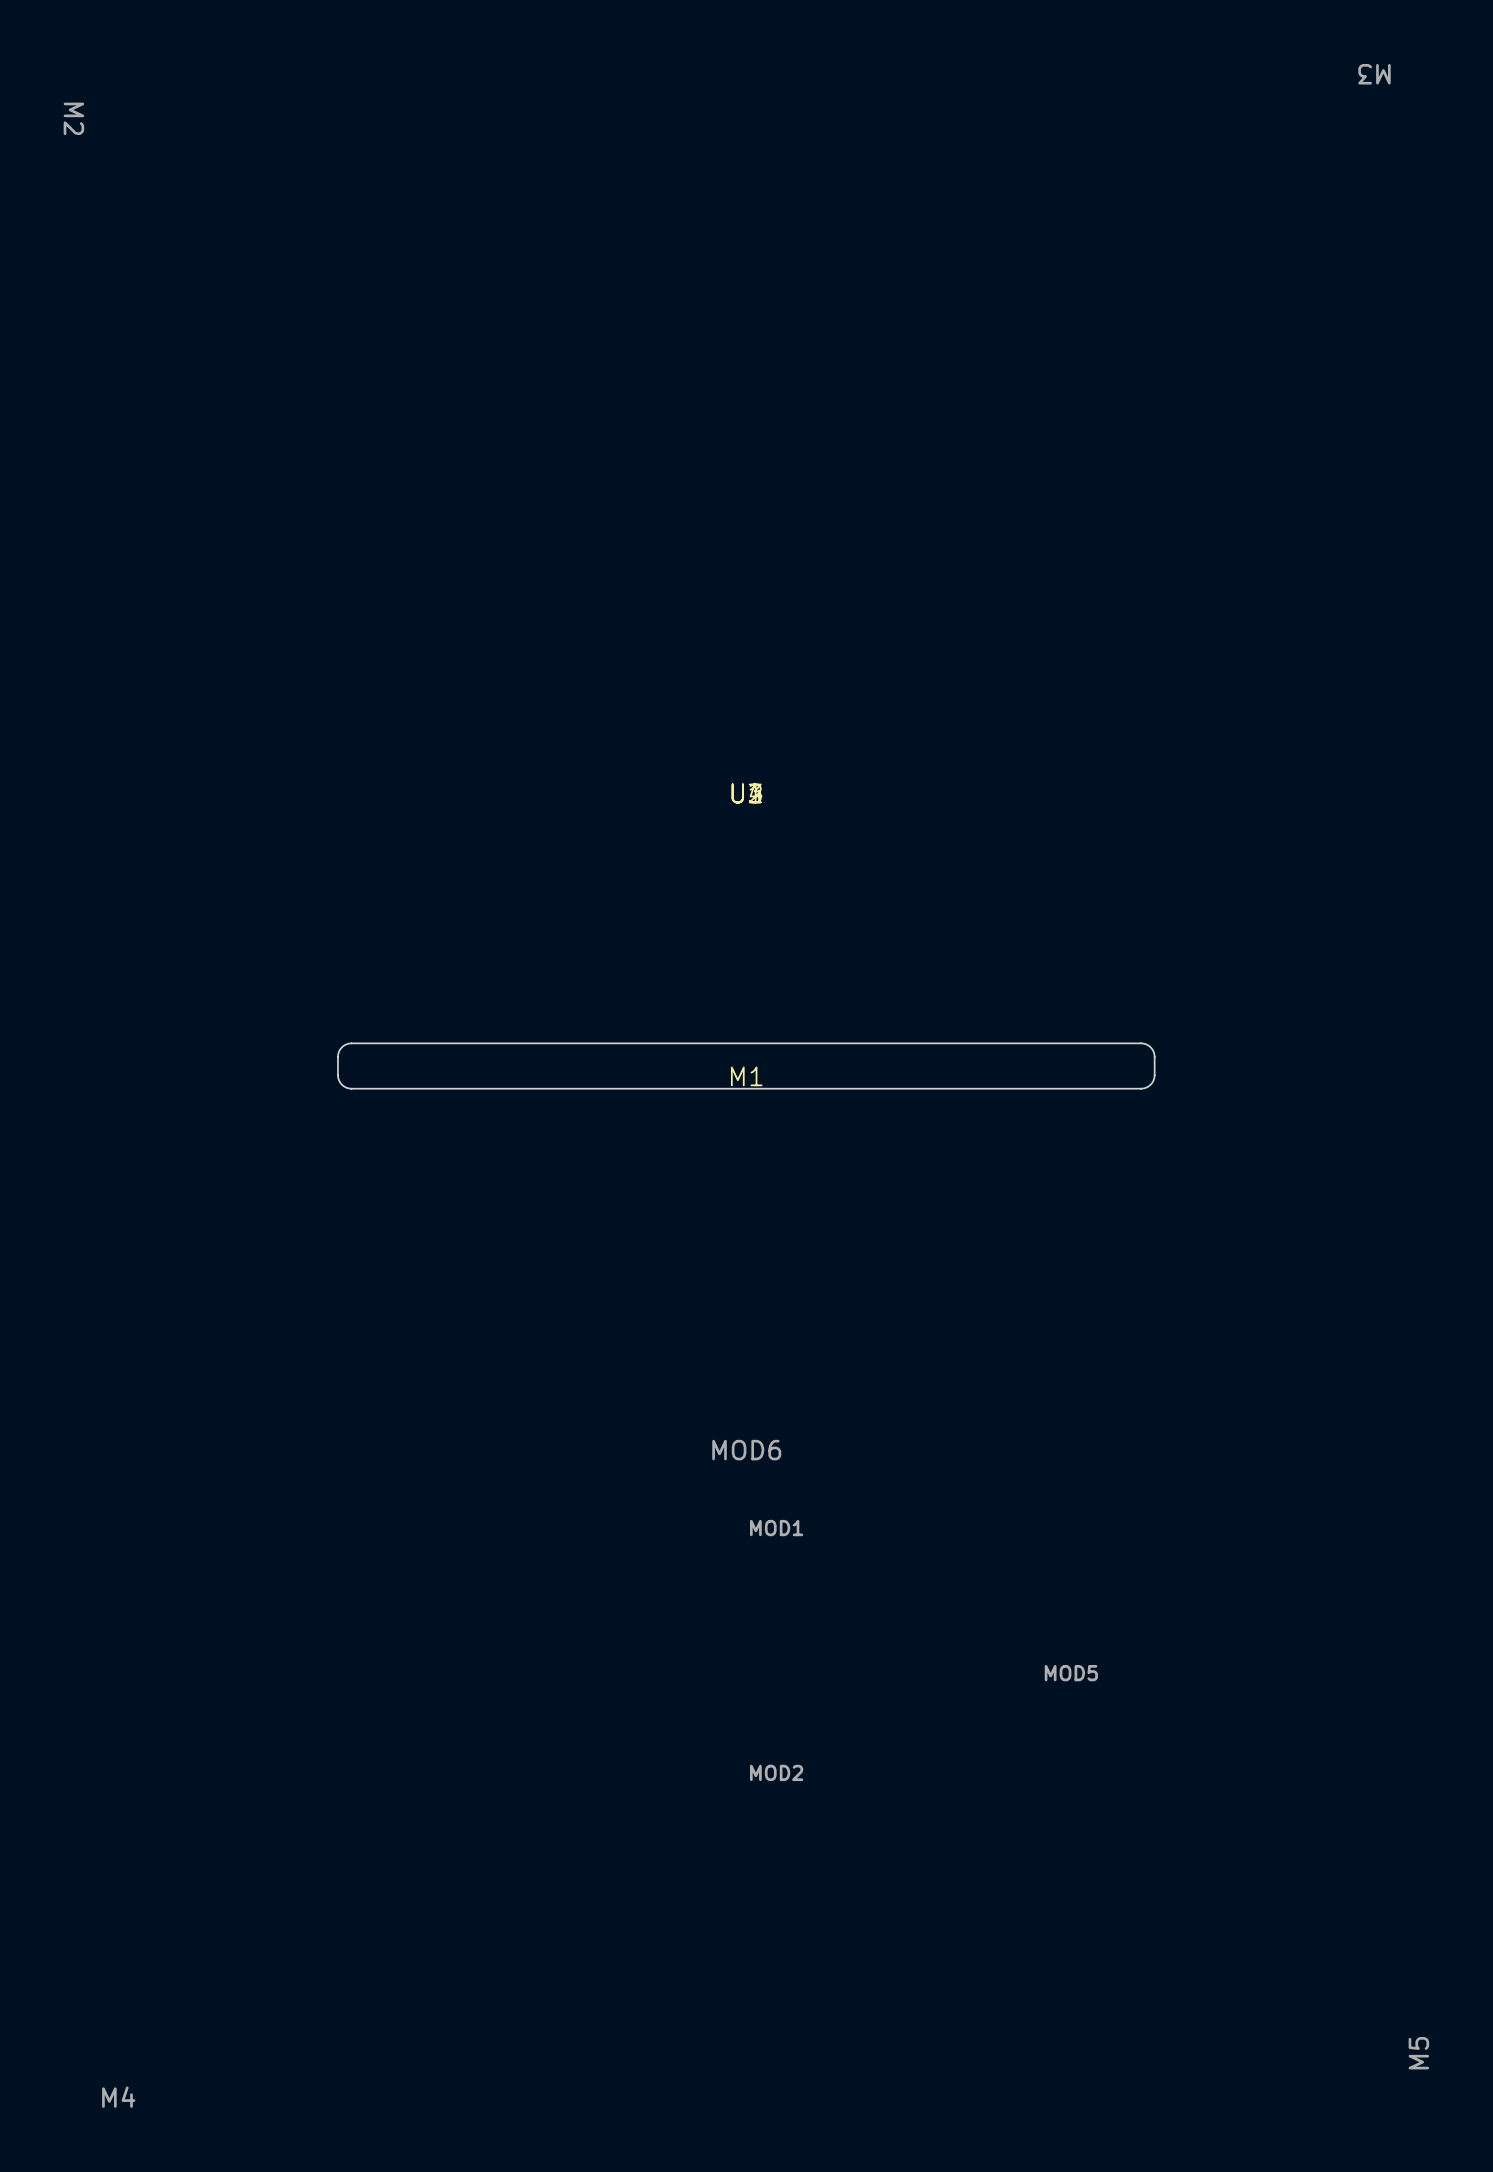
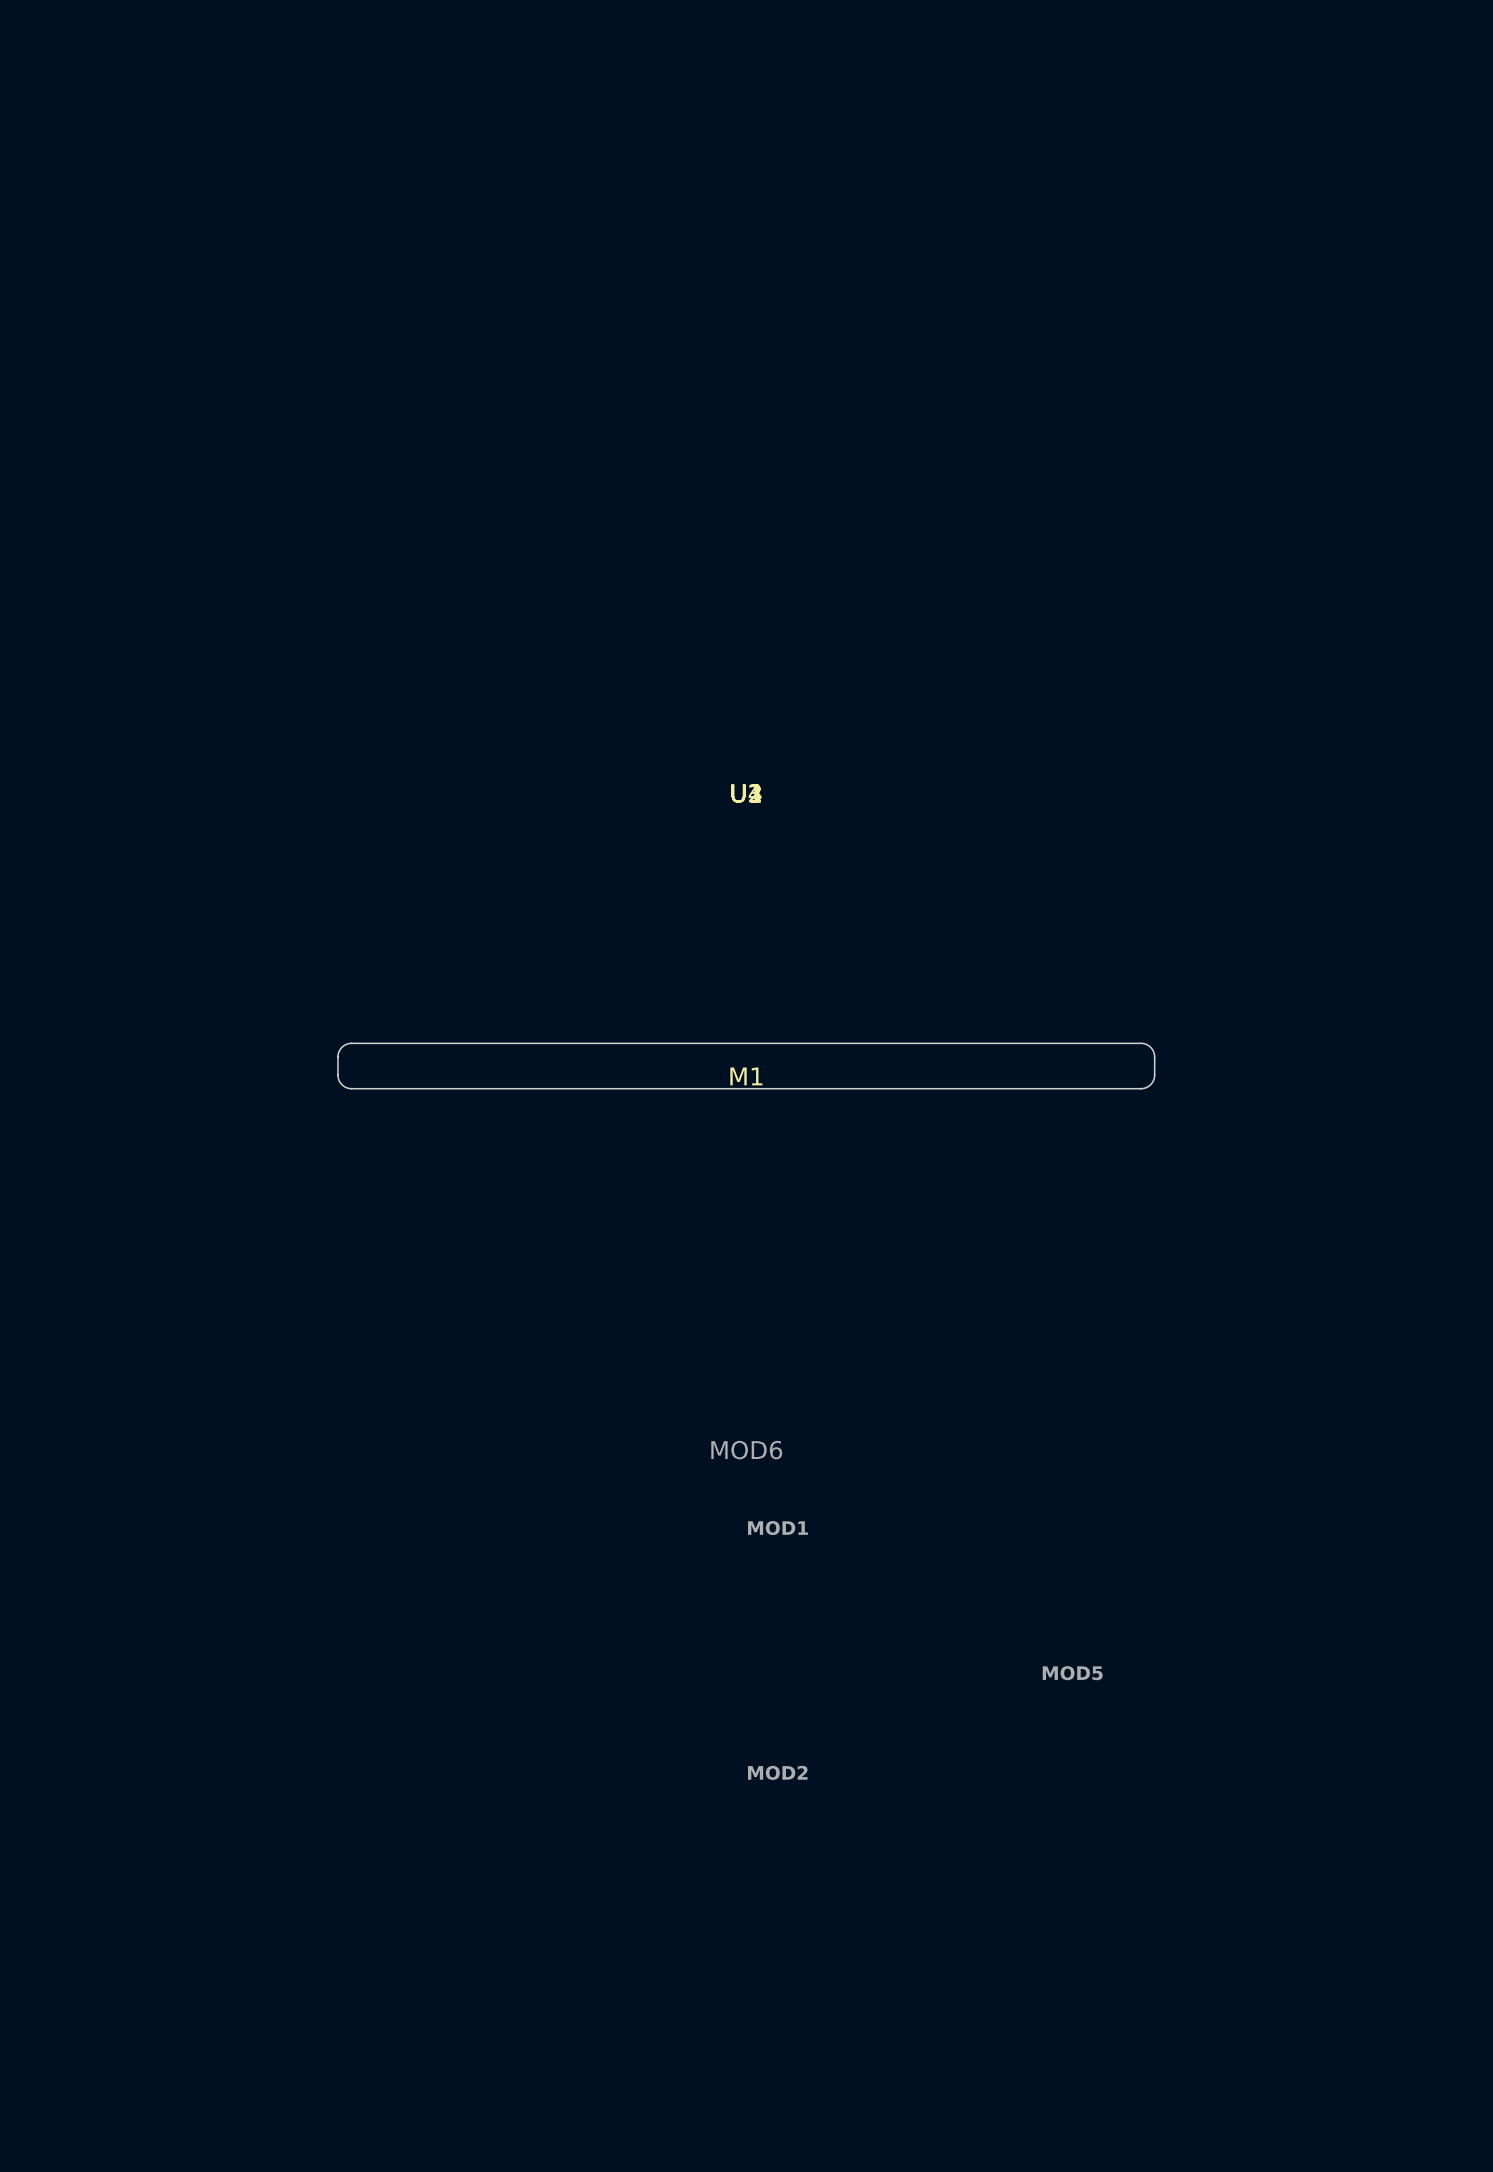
M3: (1374, 74) -> none
M2: (73, 118) -> none
M5: (1418, 2053) -> none
M4: (118, 2097) -> none

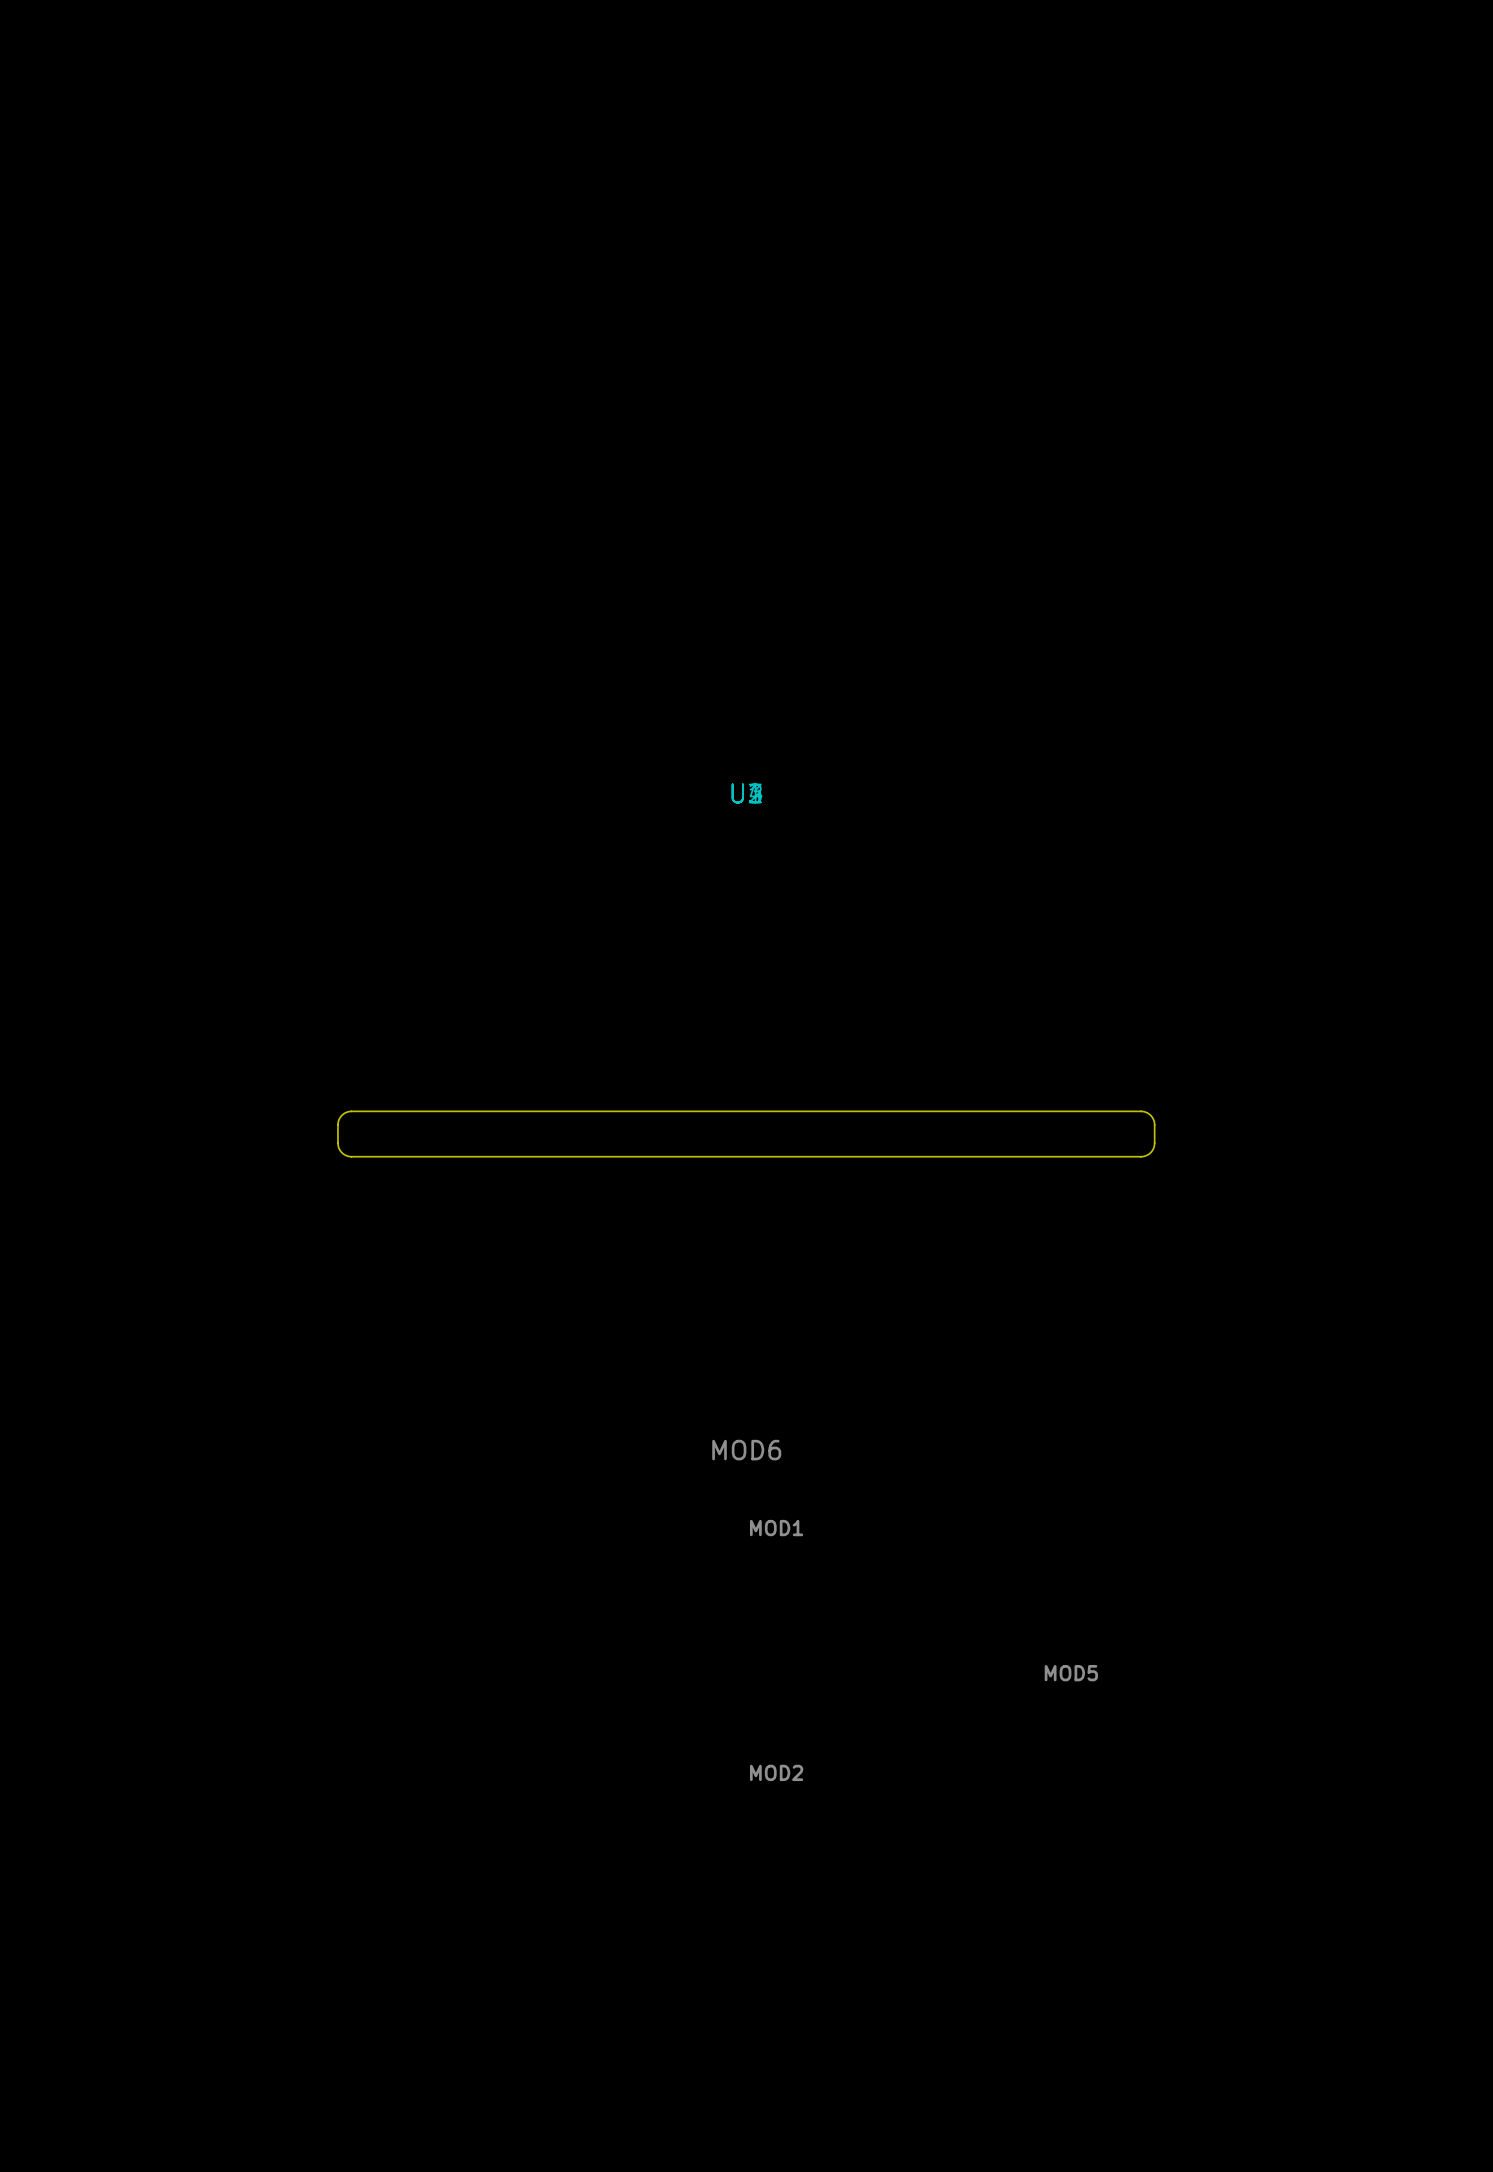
board edge: (351, 1043) (1141, 1043) (1148, 1045) (1153, 1051) (1154, 1075) (1150, 1084) (1141, 1088) (351, 1088) (341, 1084) (337, 1075) (339, 1051) (343, 1046) (351, 1043) -> (351, 1111) (1141, 1111) (1148, 1113) (1153, 1119) (1154, 1143) (1150, 1152) (1141, 1156) (351, 1156) (341, 1152) (337, 1143) (339, 1119) (343, 1114) (351, 1111)
M1: (746, 1076) -> none

